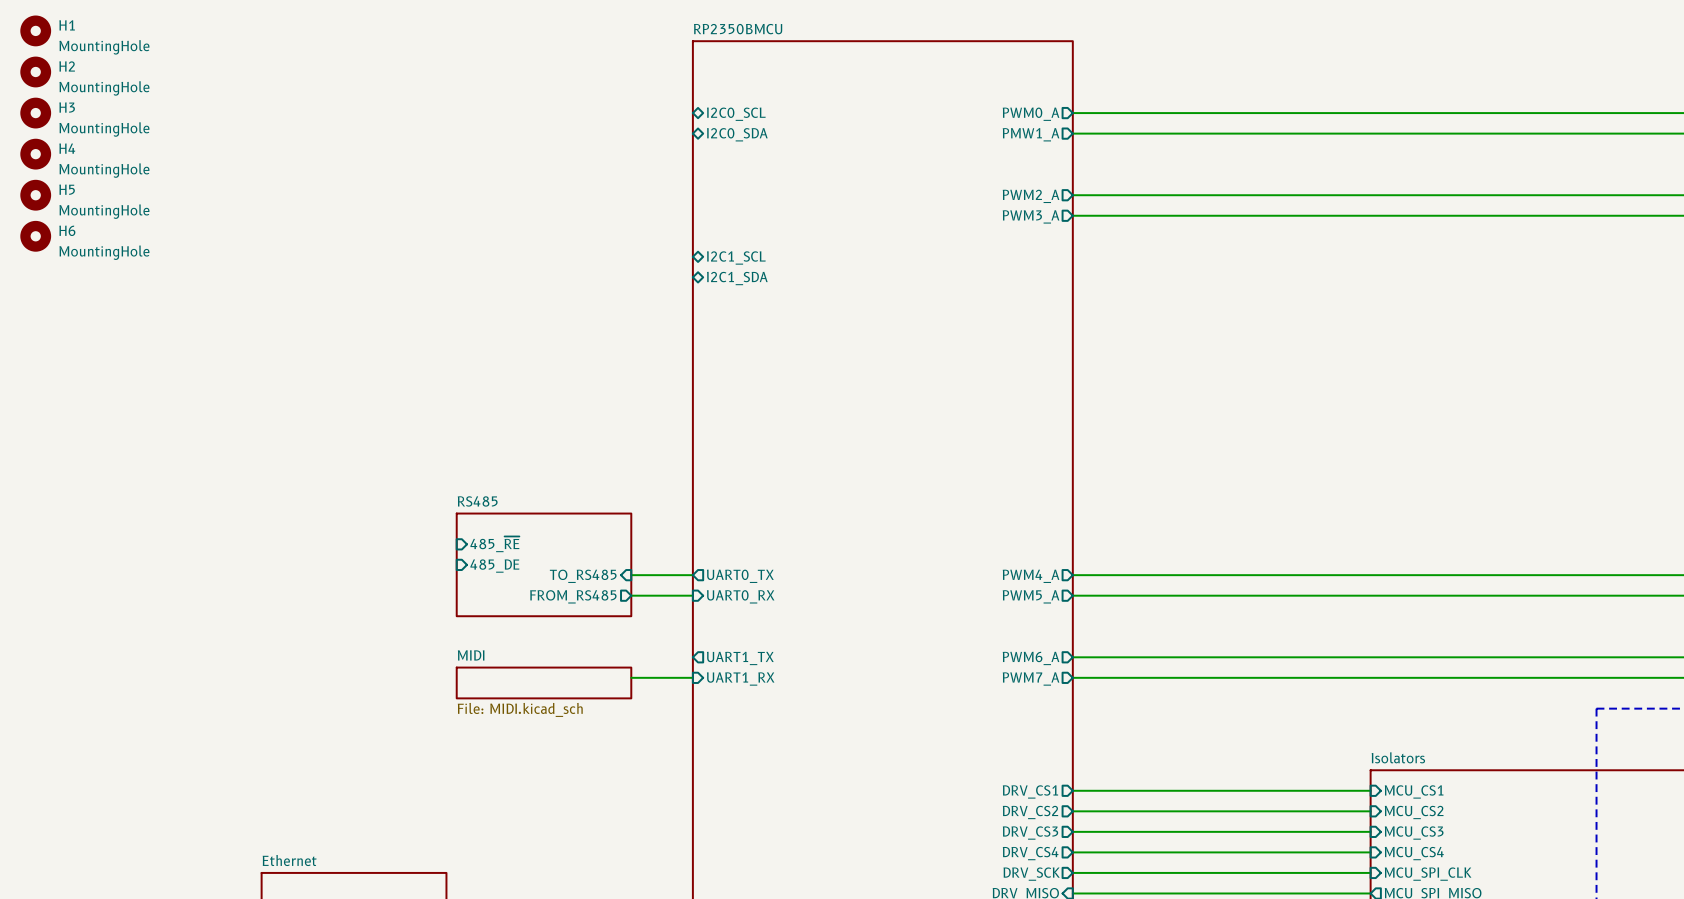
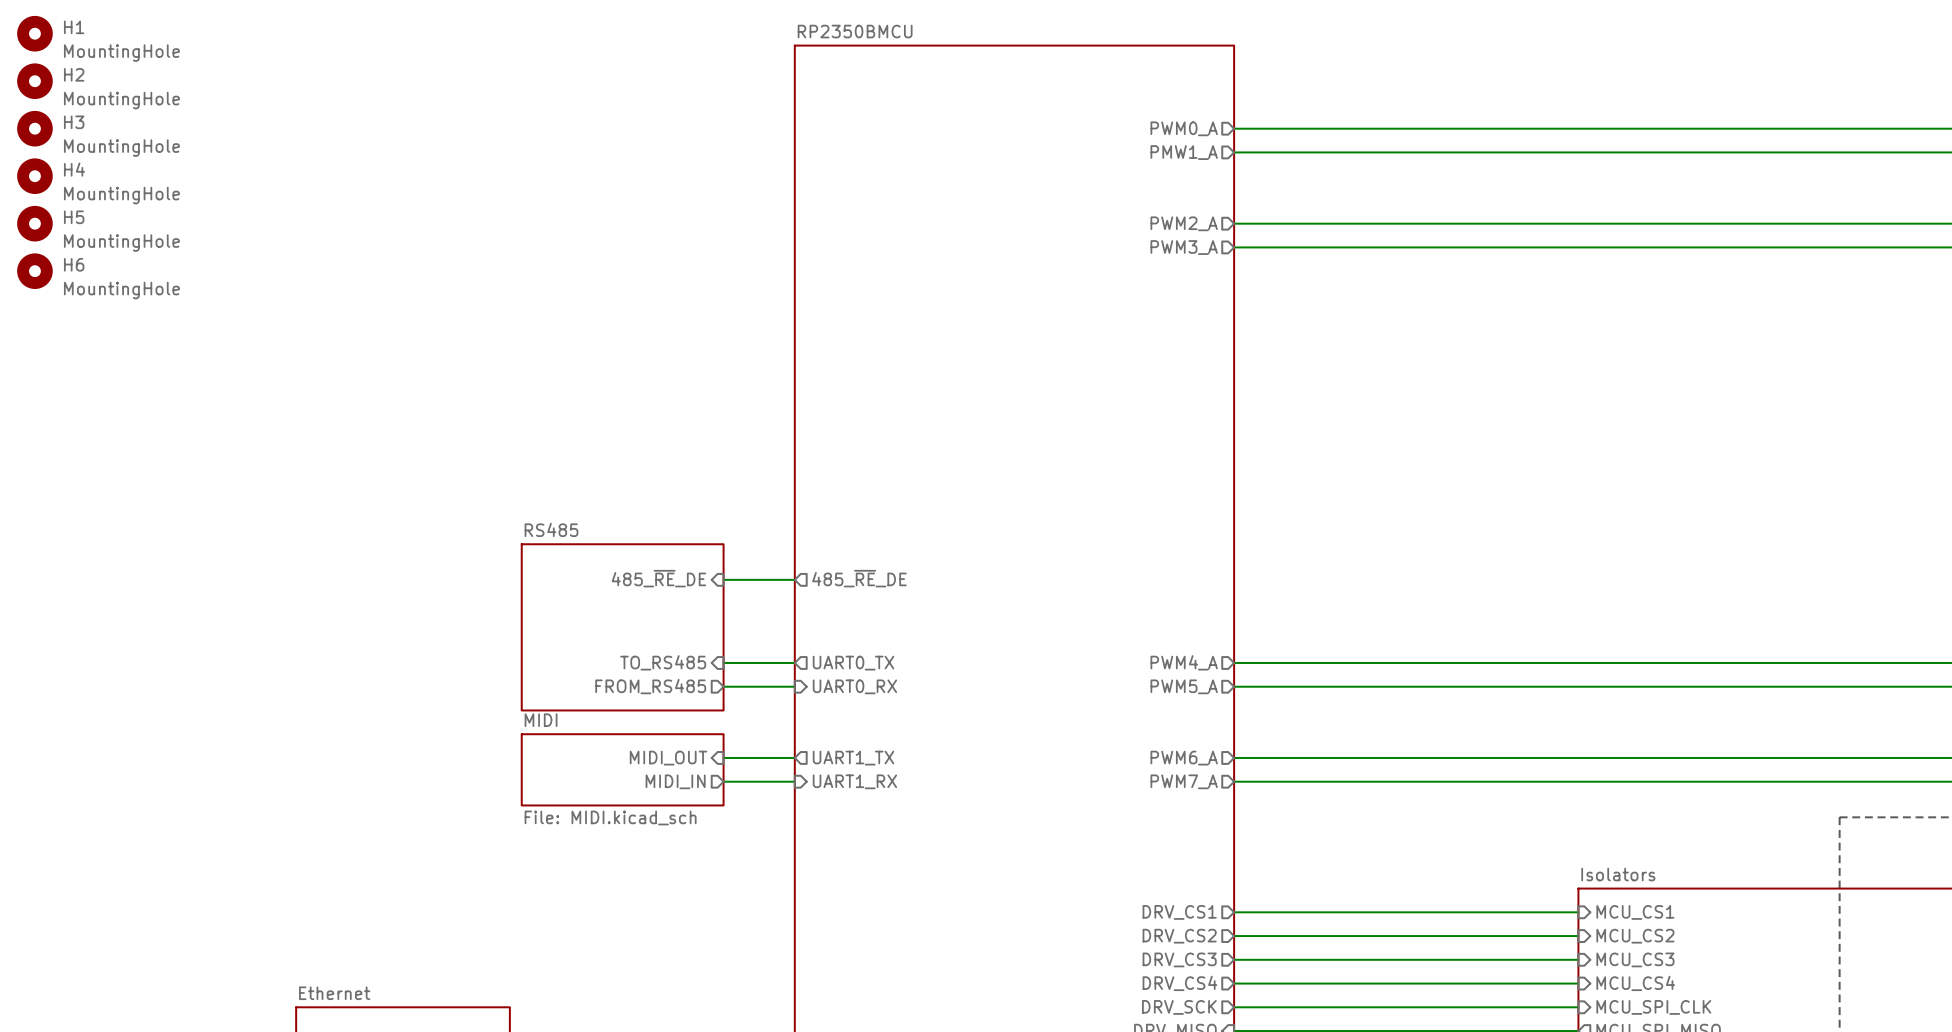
sheet pin: I2C0_SCL (736, 114) -> none
sheet pin: I2C0_SDA (737, 134) -> none
sheet pin: I2C1_SCL (736, 257) -> none
sheet pin: I2C1_SDA (737, 278) -> none
sheet RS485 name position: RS485 (477, 501) -> RS485 (551, 529)
sheet pin: none -> 485_~{RE}_DE (658, 578)
wire: none -> (723, 579) (794, 579)
sheet pin: none -> 485_~{RE}_DE (859, 578)
sheet RS485 shape: [456, 512, 632, 617] -> [521, 543, 725, 712]
sheet pin: 485_~{RE} (494, 544) -> none
sheet pin: 485_DE (494, 566) -> none
wire: none -> (723, 757) (794, 757)
sheet pin: none -> MIDI_OUT (668, 758)
sheet MIDI: none -> File: MIDI.kicad_sch (622, 769)
sheet pin: none -> MIDI_IN (675, 781)
sheet MIDI: File: MIDI.kicad_sch (544, 682) -> none

